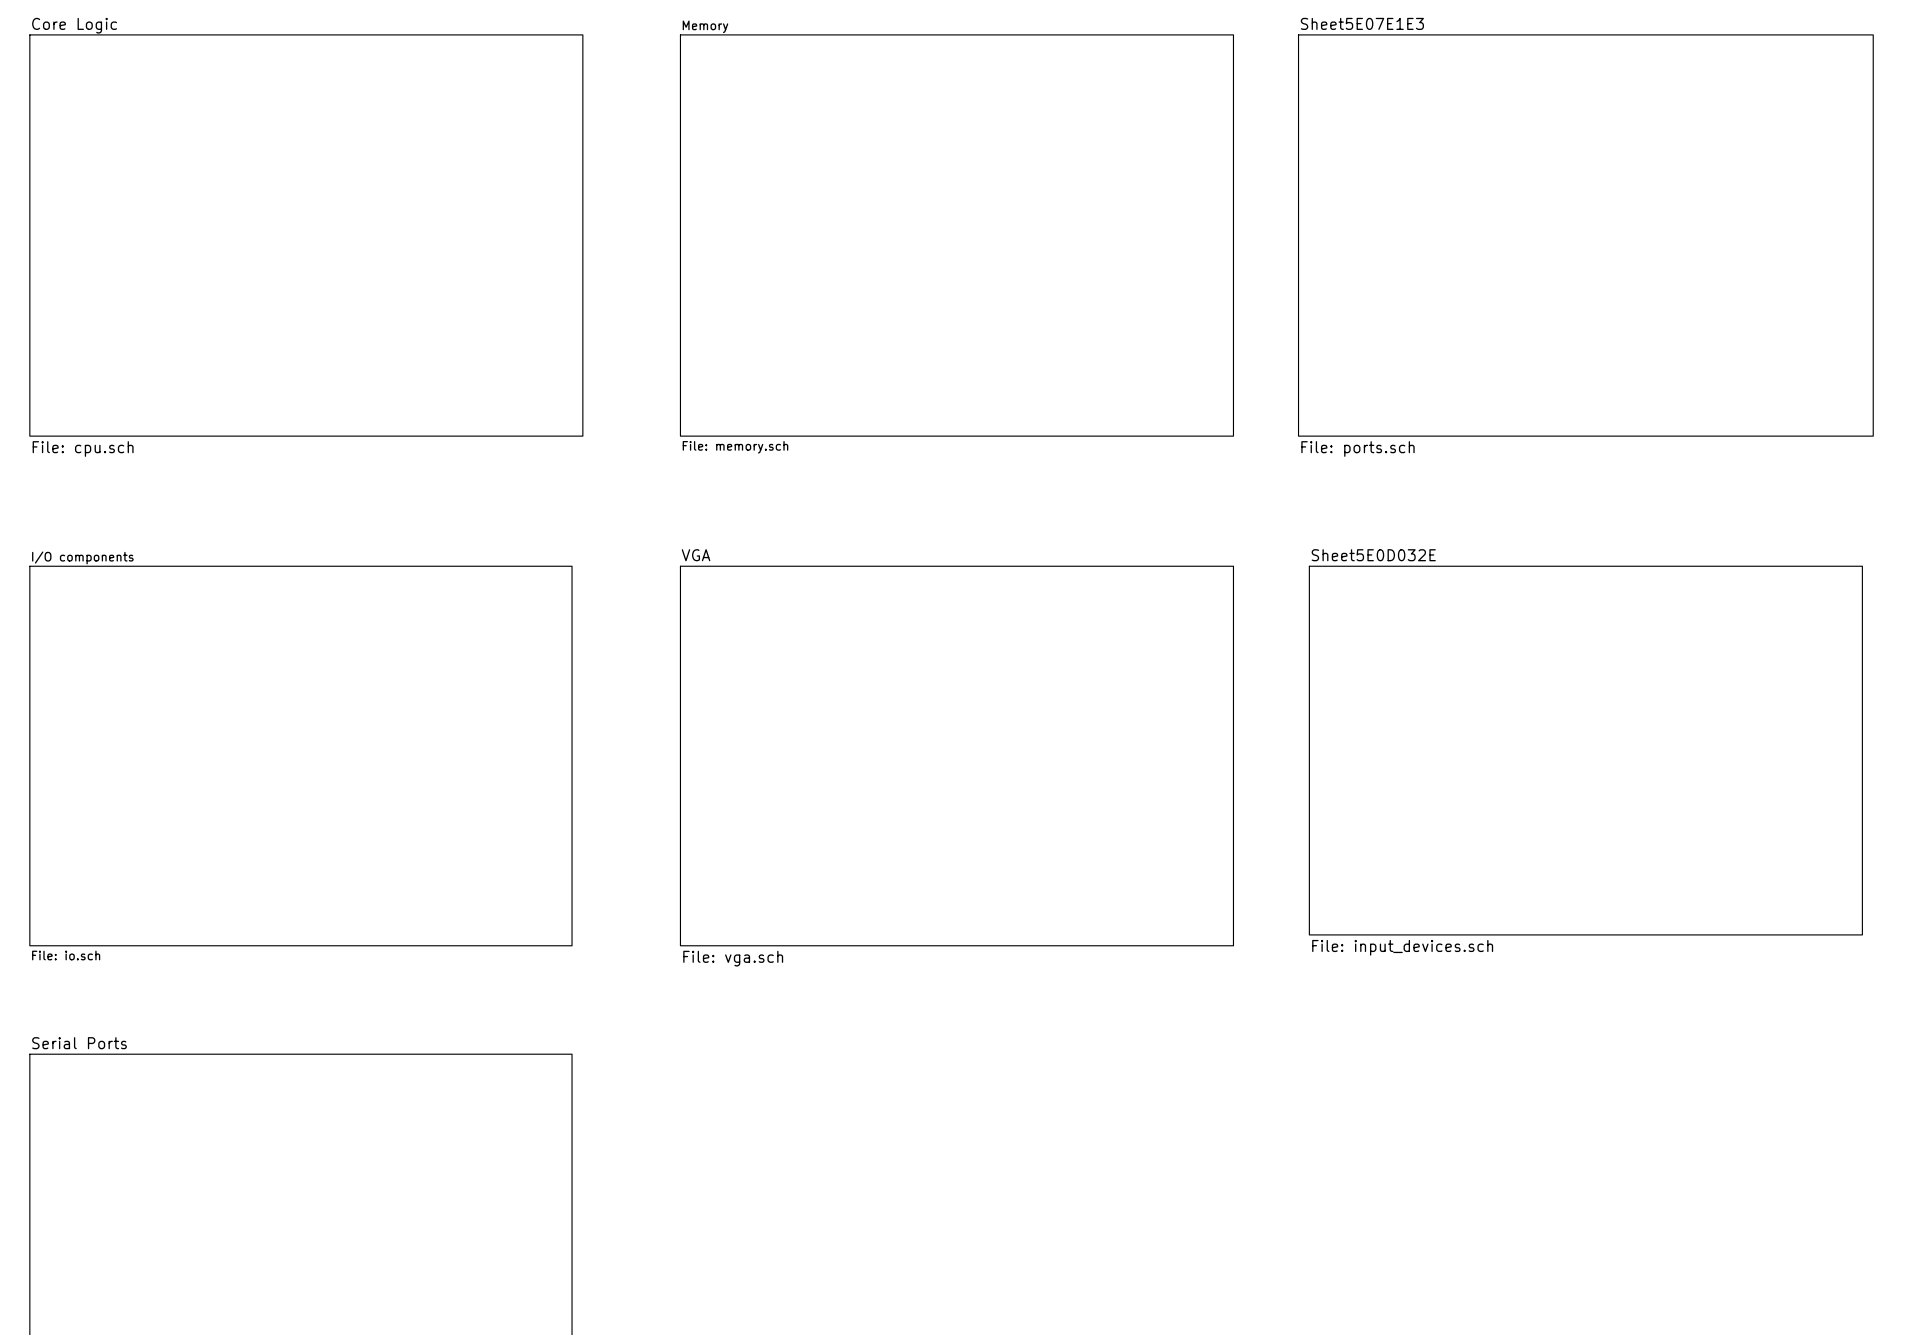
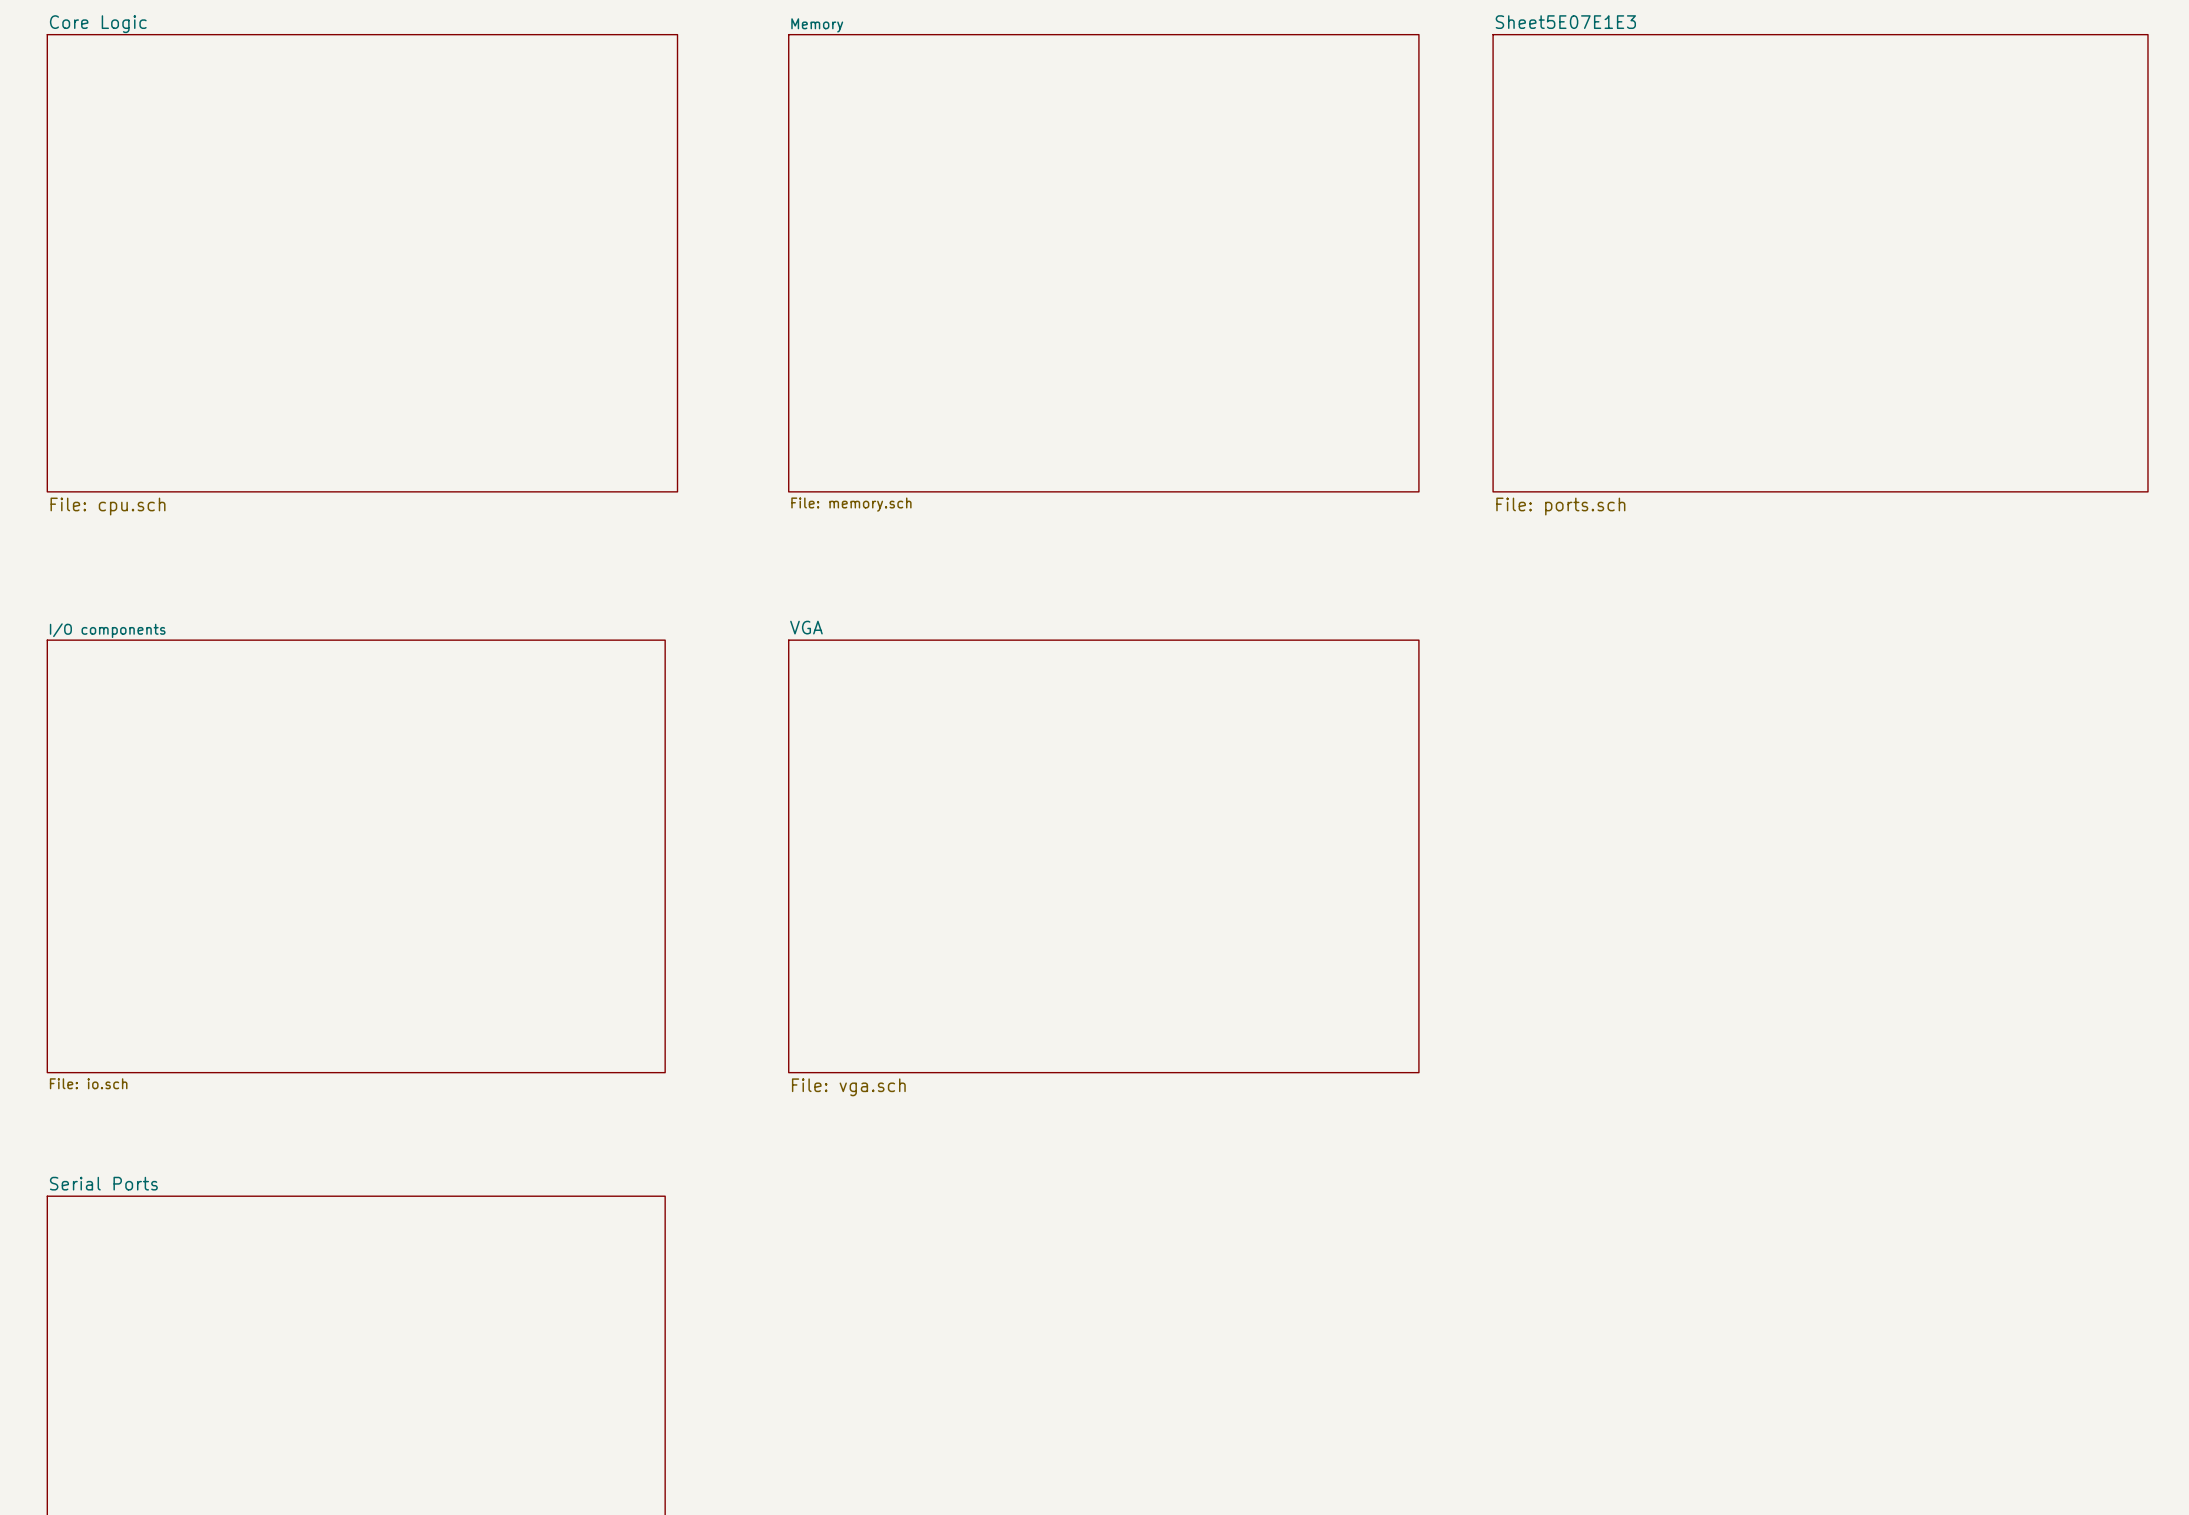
sheet Sheet5E0D032E: File: input_devices.sch (1585, 750) -> none

